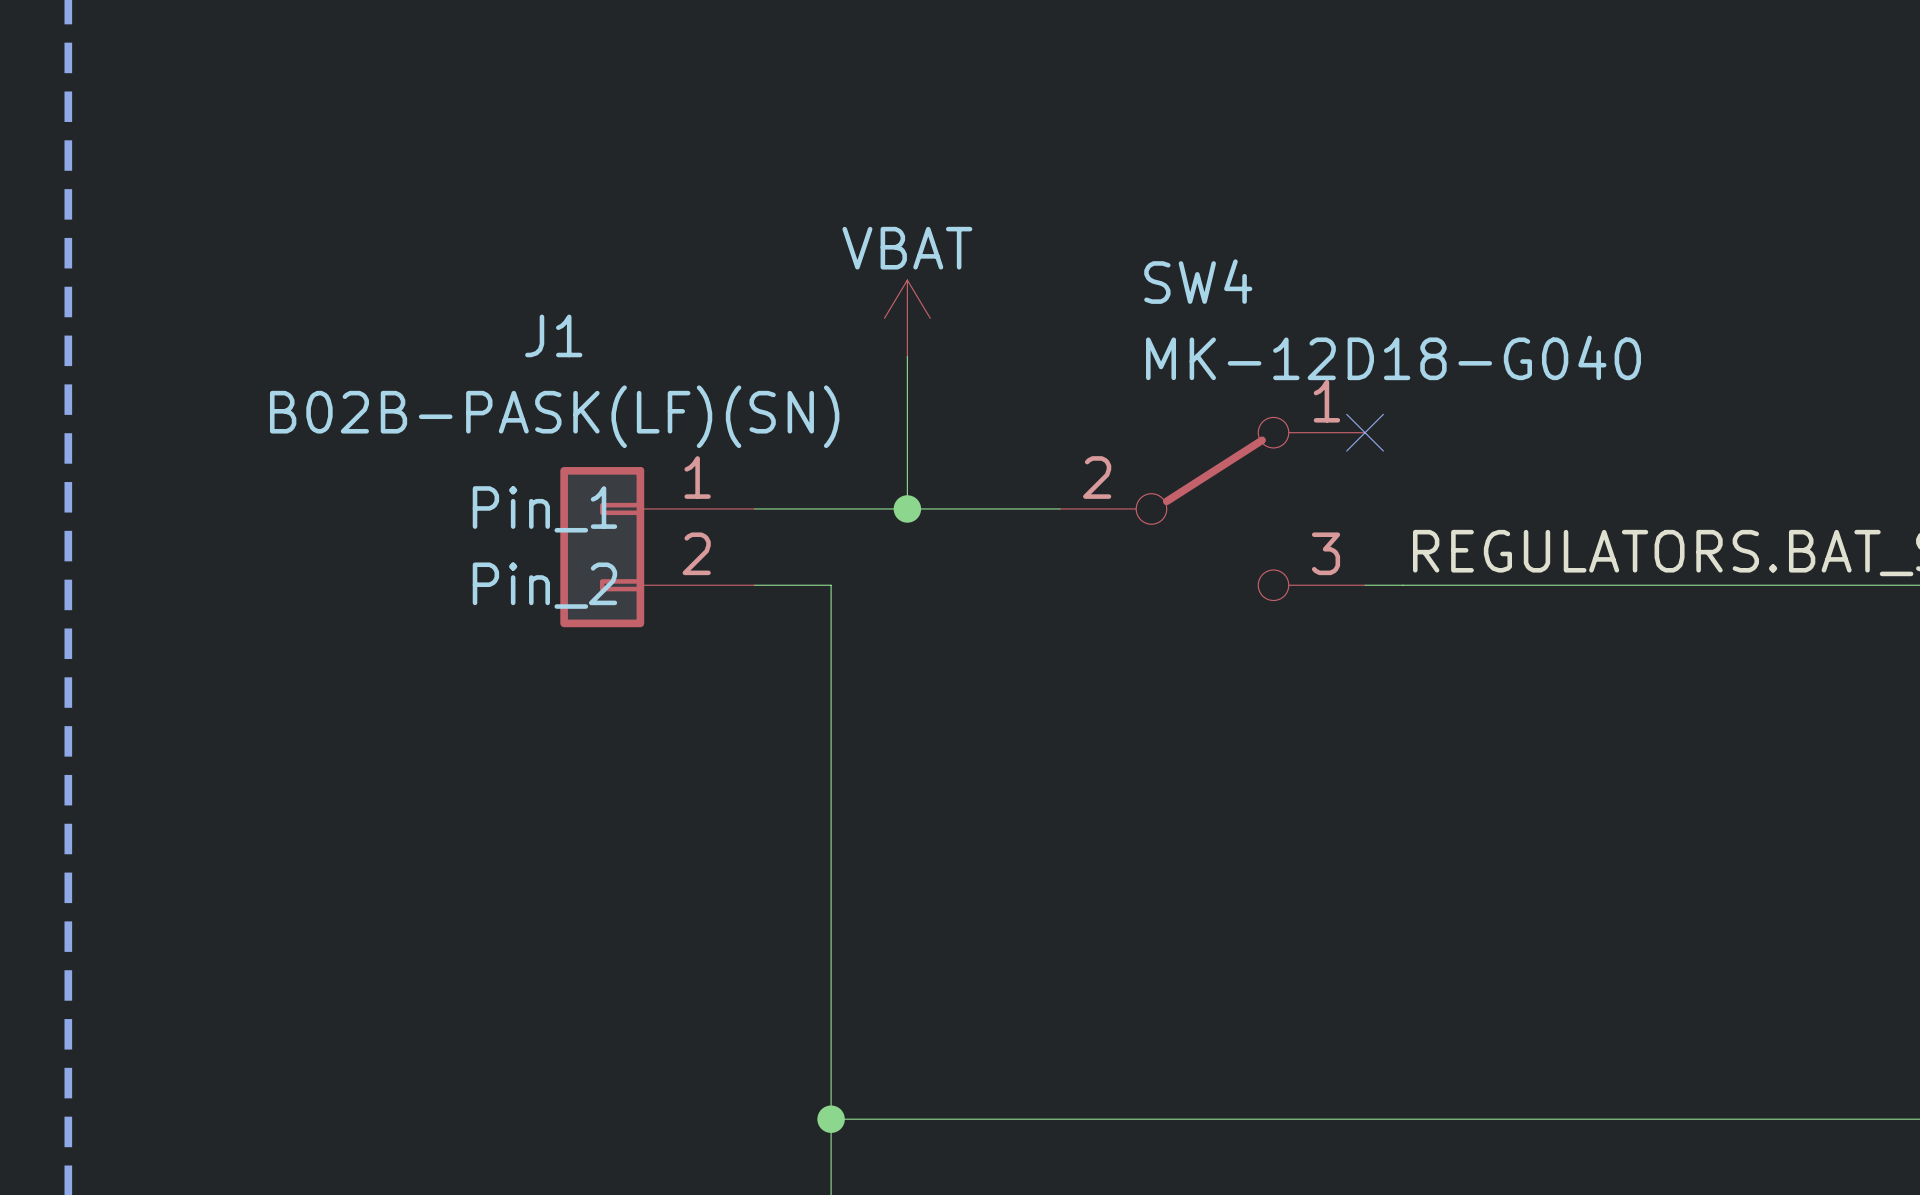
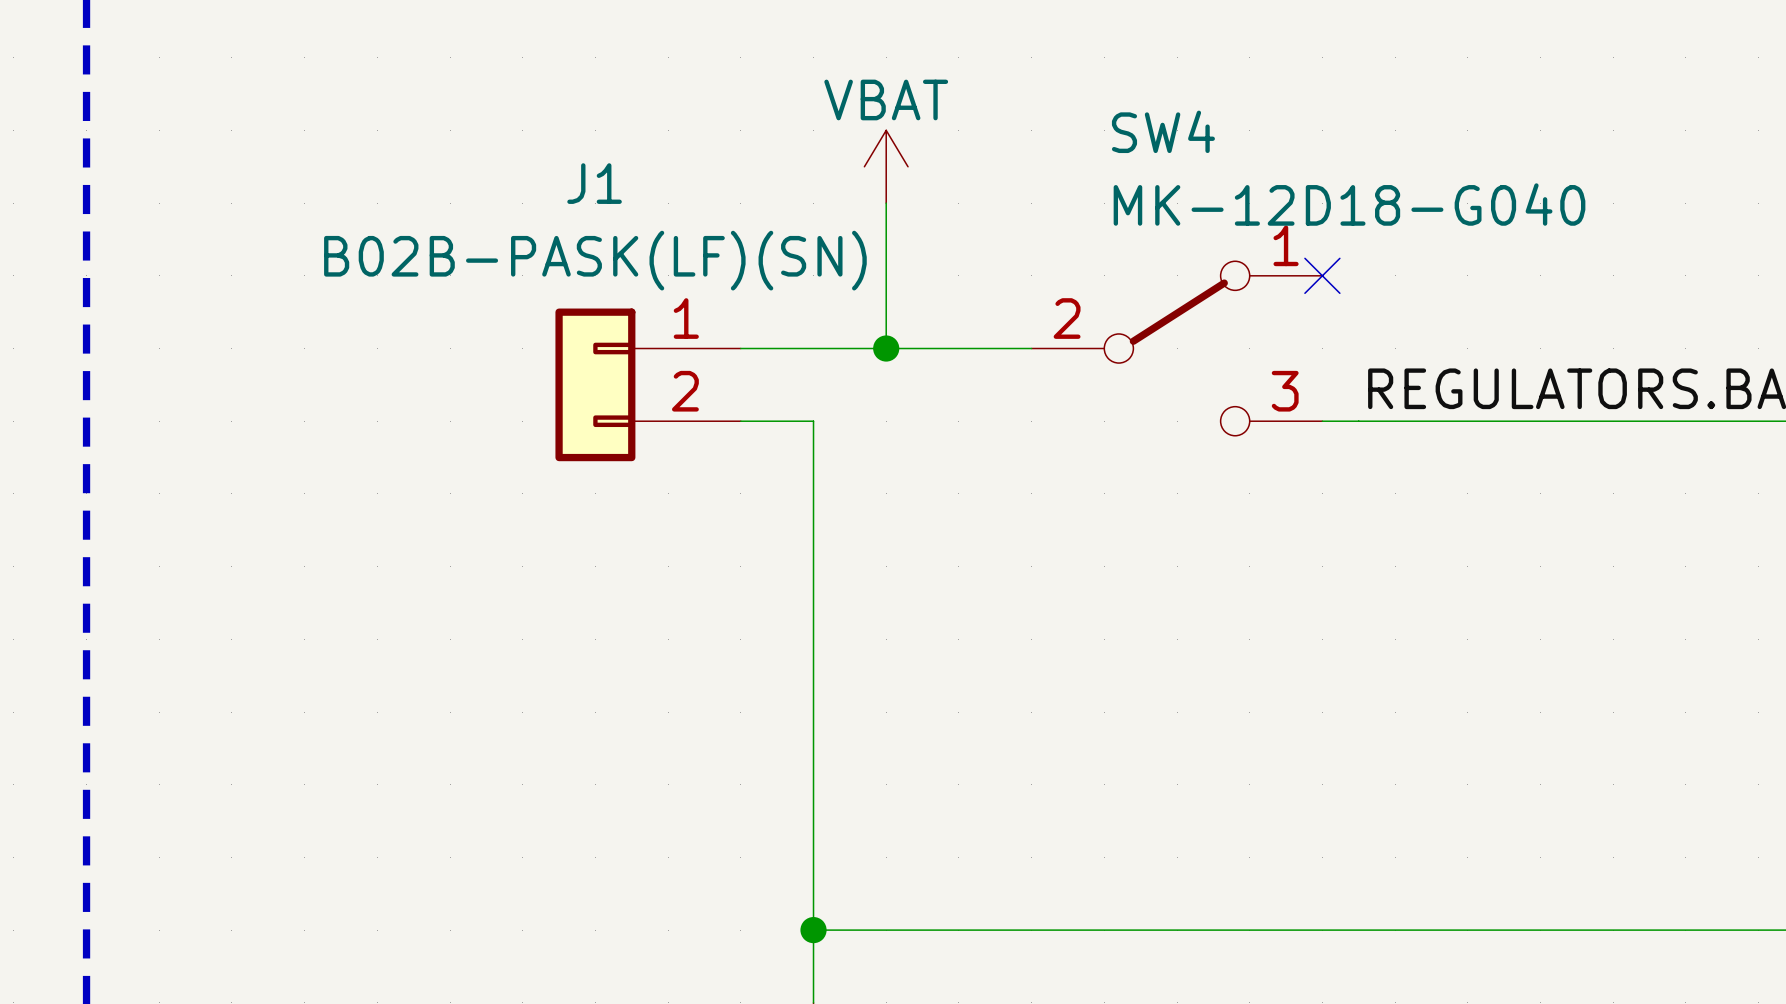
J1 name position: J1 (553, 335) -> J1 (594, 183)
J1 value position: B02B-PASK(LF)(SN) (554, 416) -> B02B-PASK(LF)(SN) (595, 260)
J1 pin name: Pin_1 (544, 509) -> none
J1 pin name: Pin_2 (544, 585) -> none

